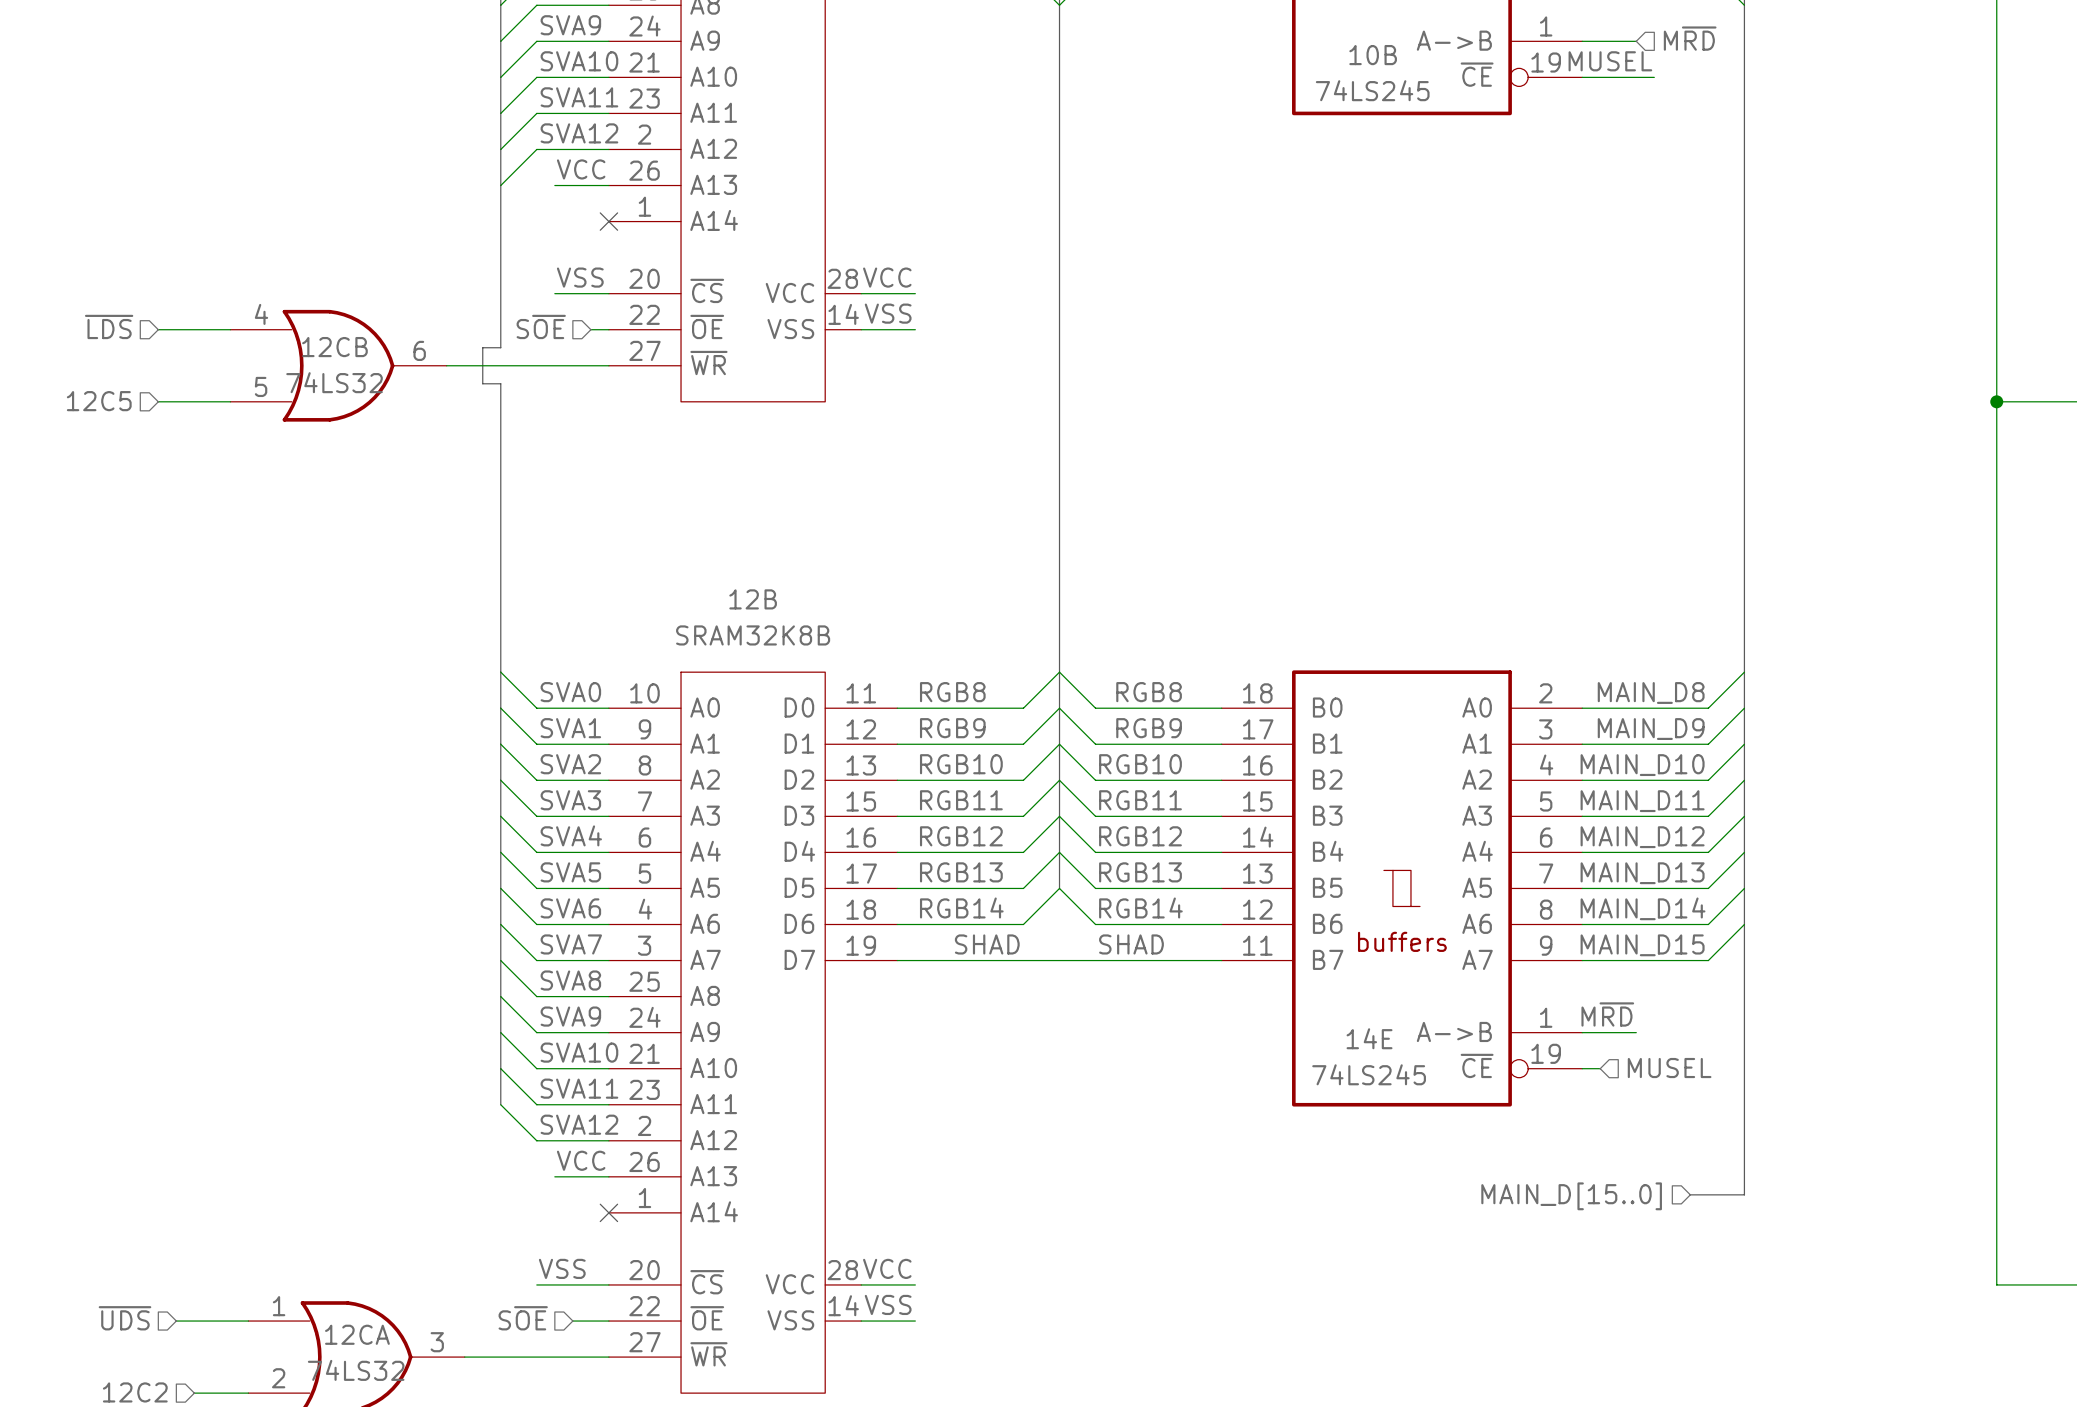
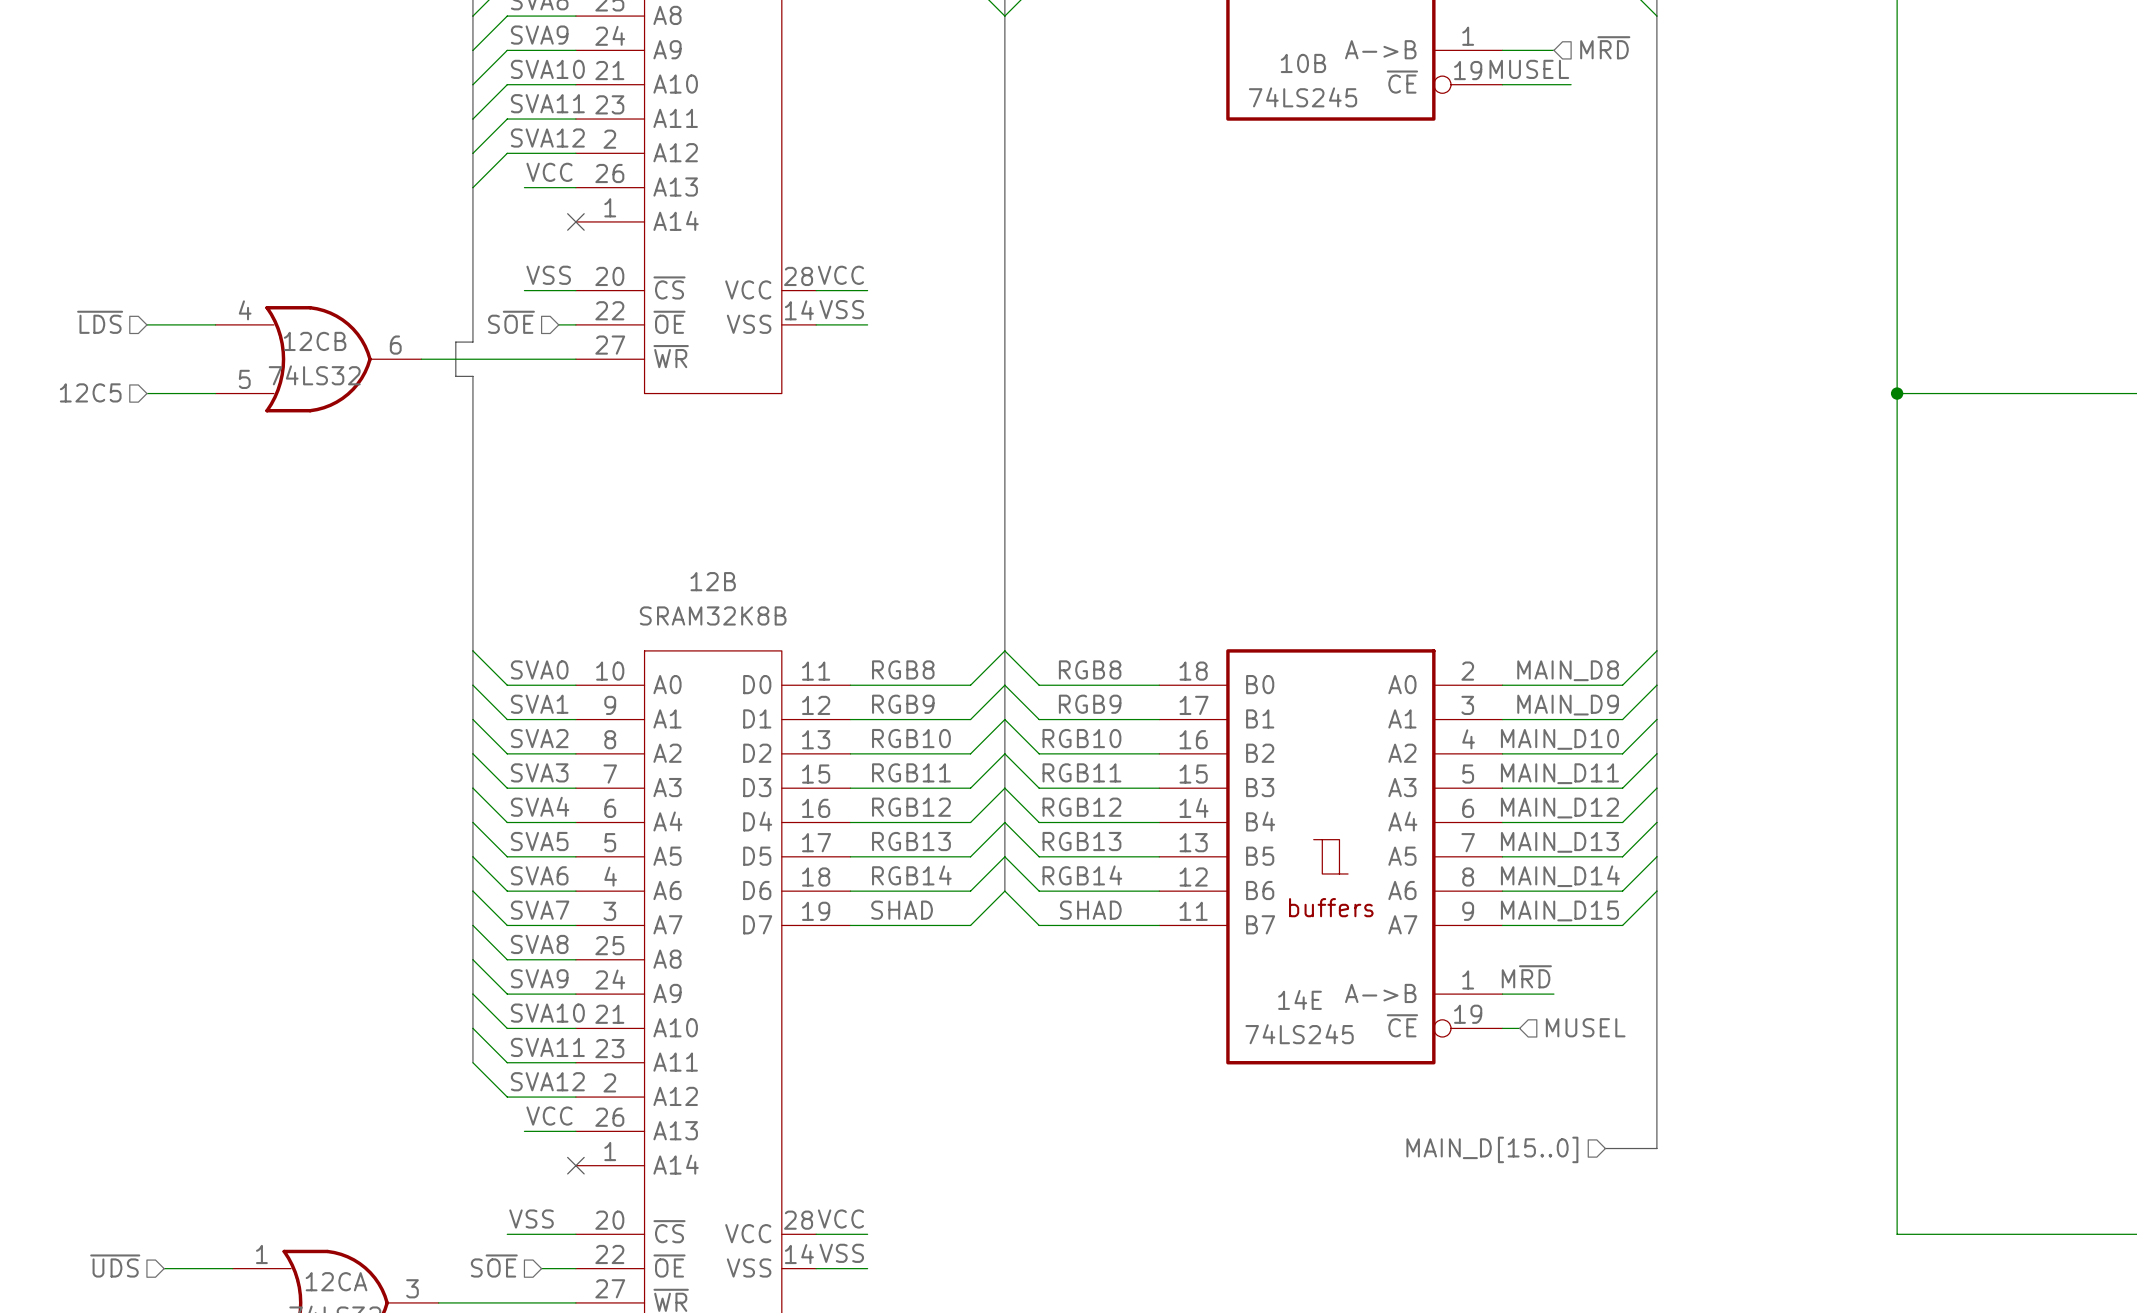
bus: none -> (1004, 856) (1004, 891)
label position: SHAD (987, 944) -> SHAD (902, 910)
label position: SHAD (1131, 944) -> SHAD (1090, 910)
wire: (1023, 960) (1095, 960) -> (970, 925) (1004, 891) (1039, 925)

